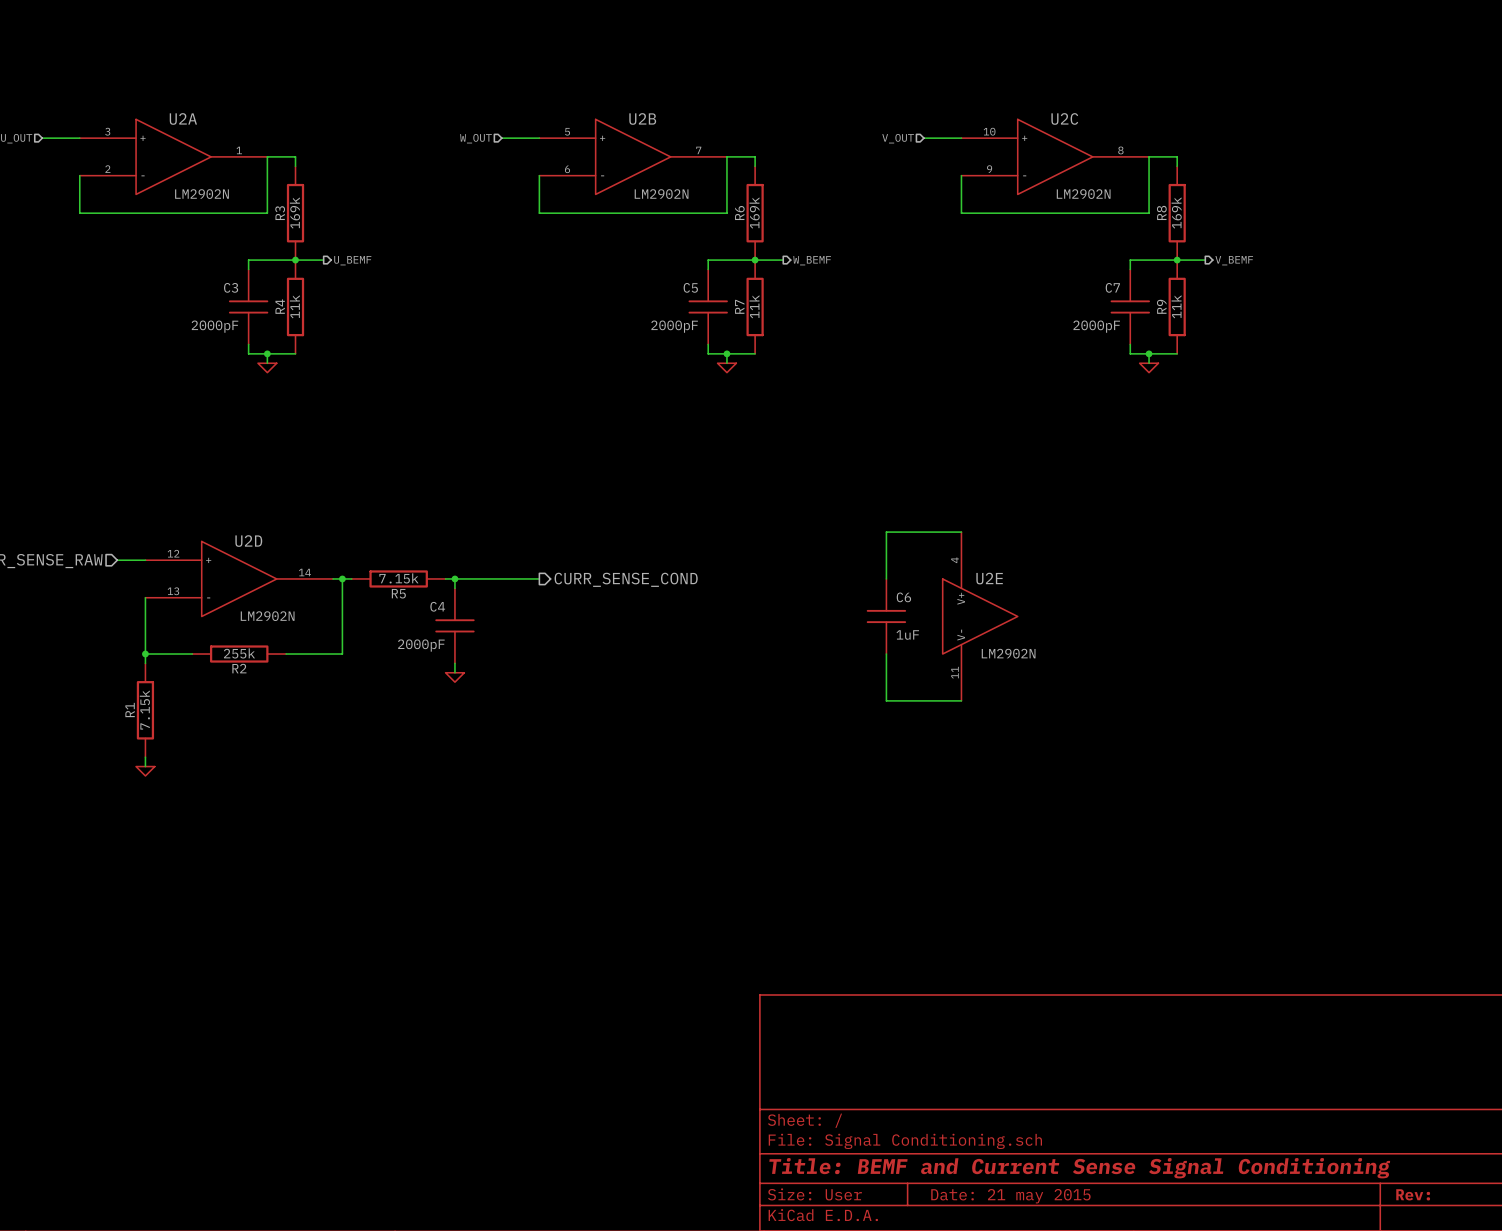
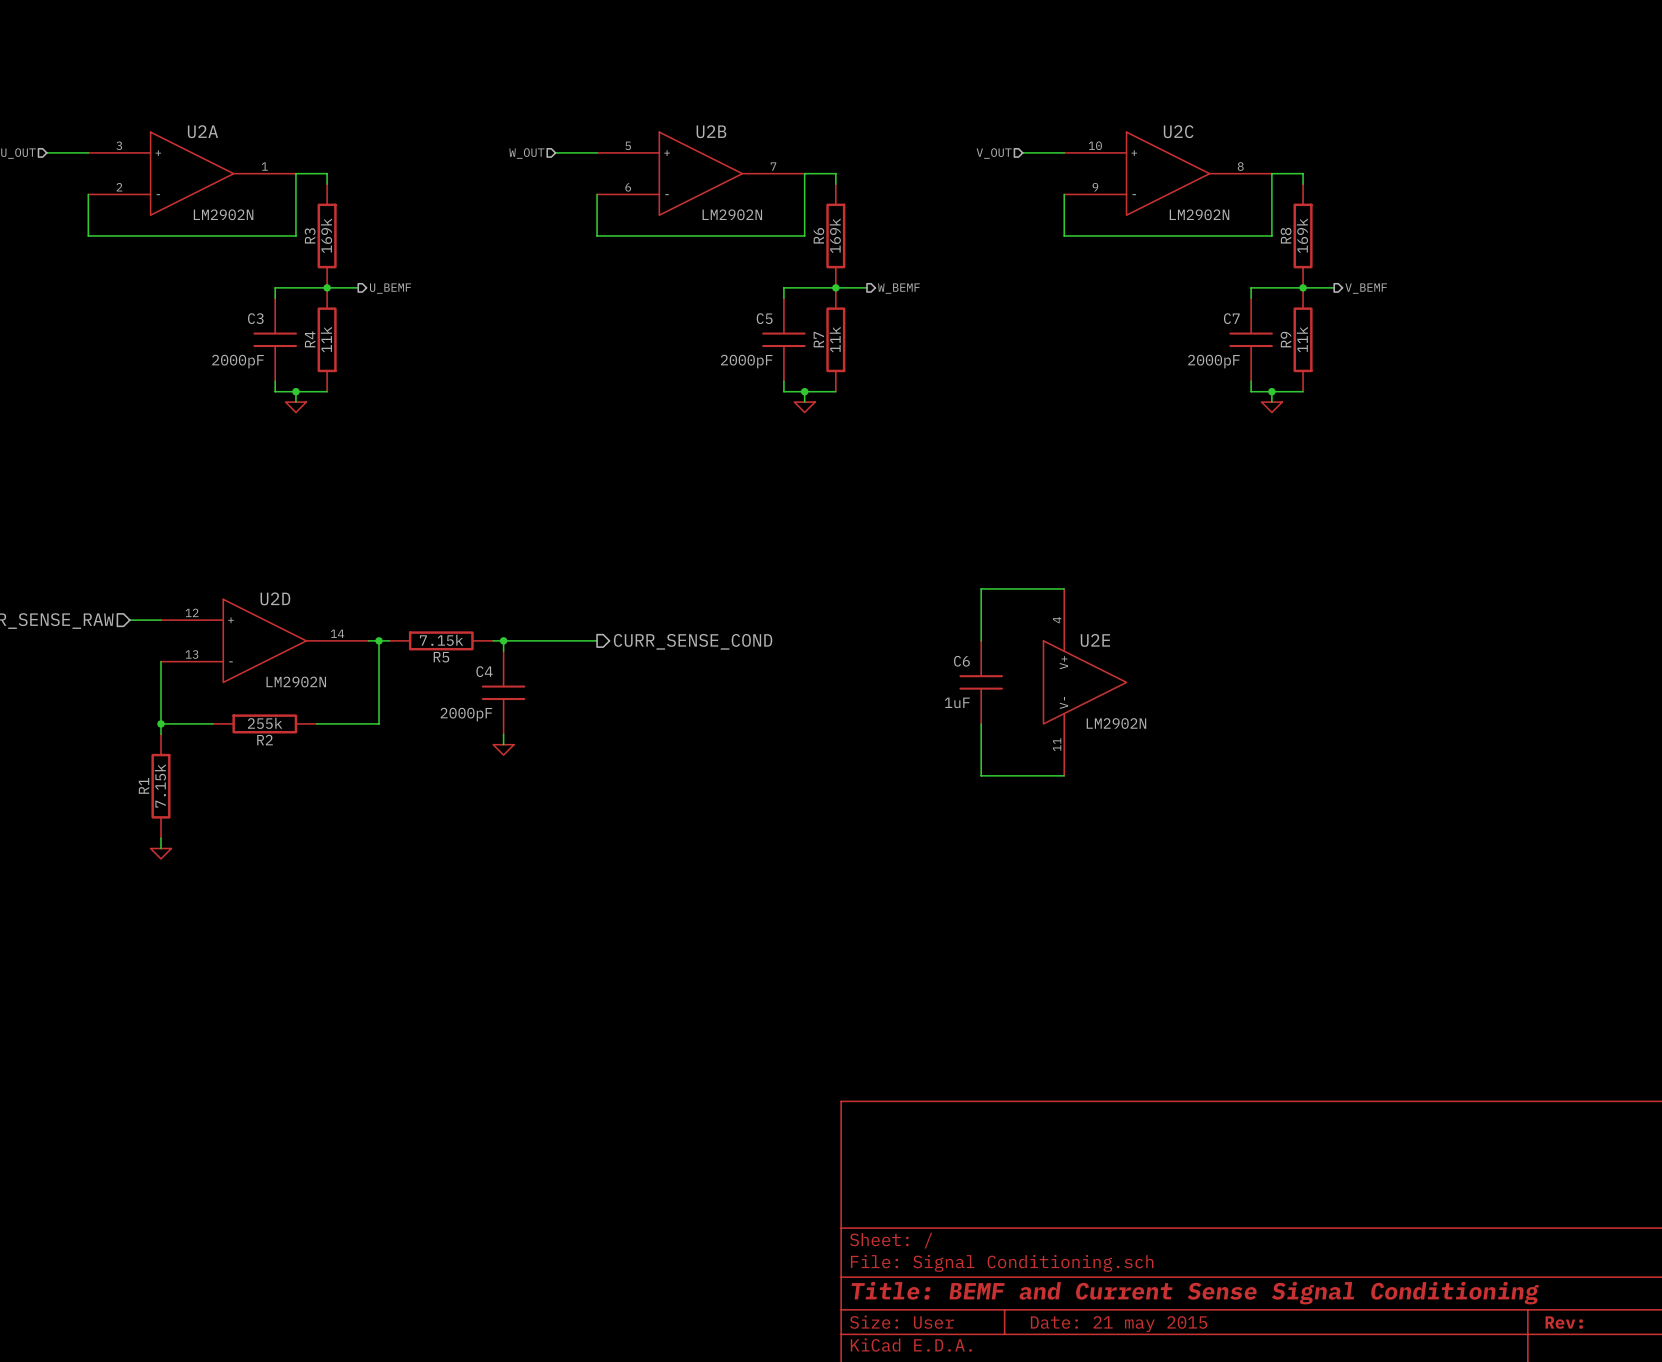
C6 name position: C6 (903, 597) -> C6 (961, 661)
C6 value position: 1uF (907, 634) -> 1uF (957, 702)

